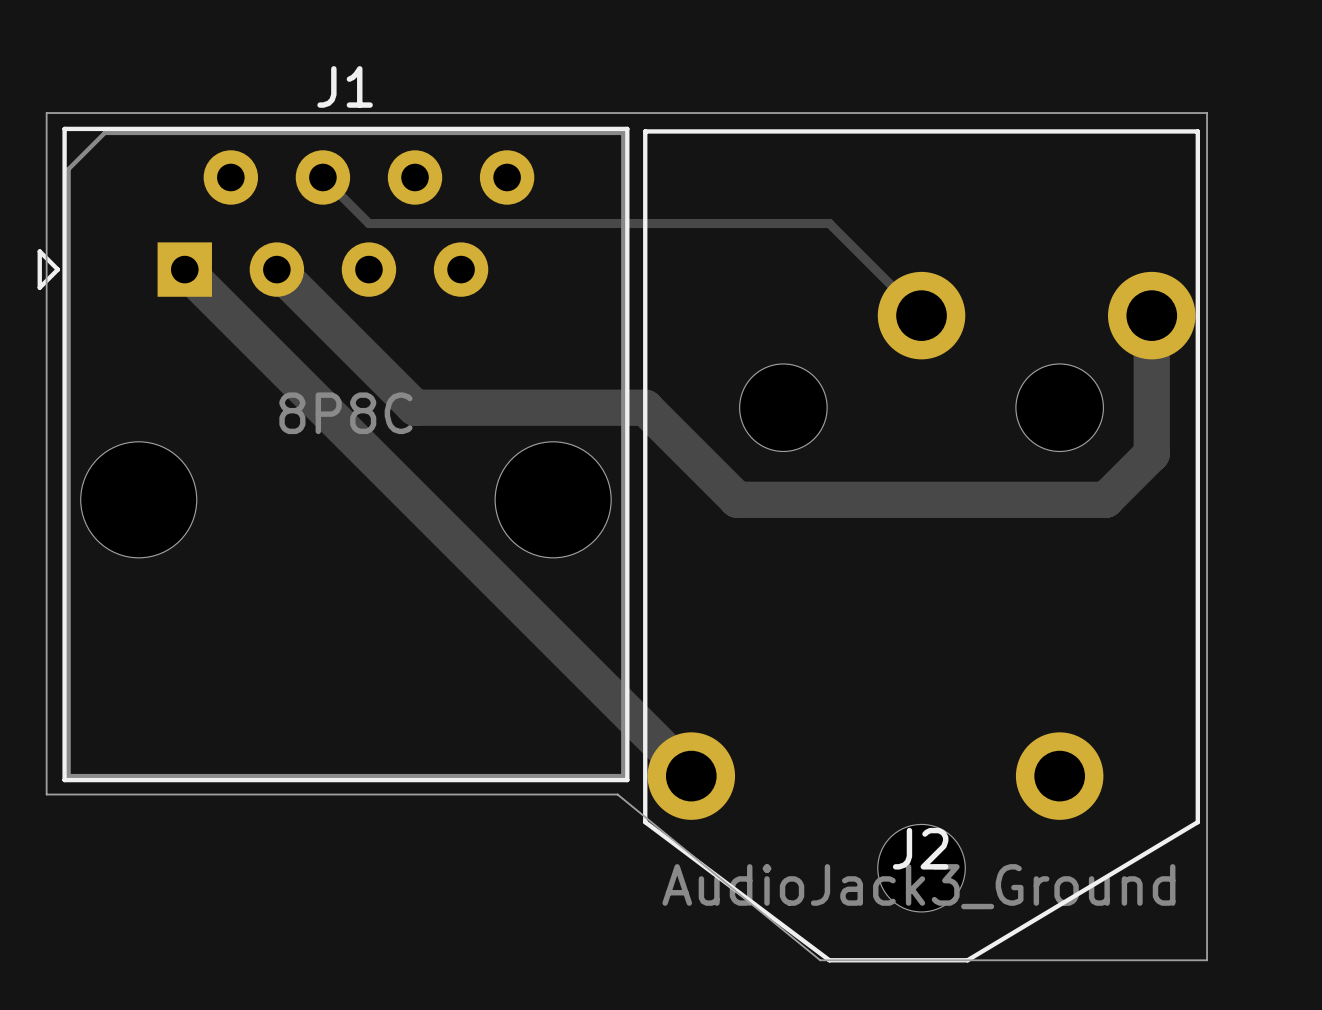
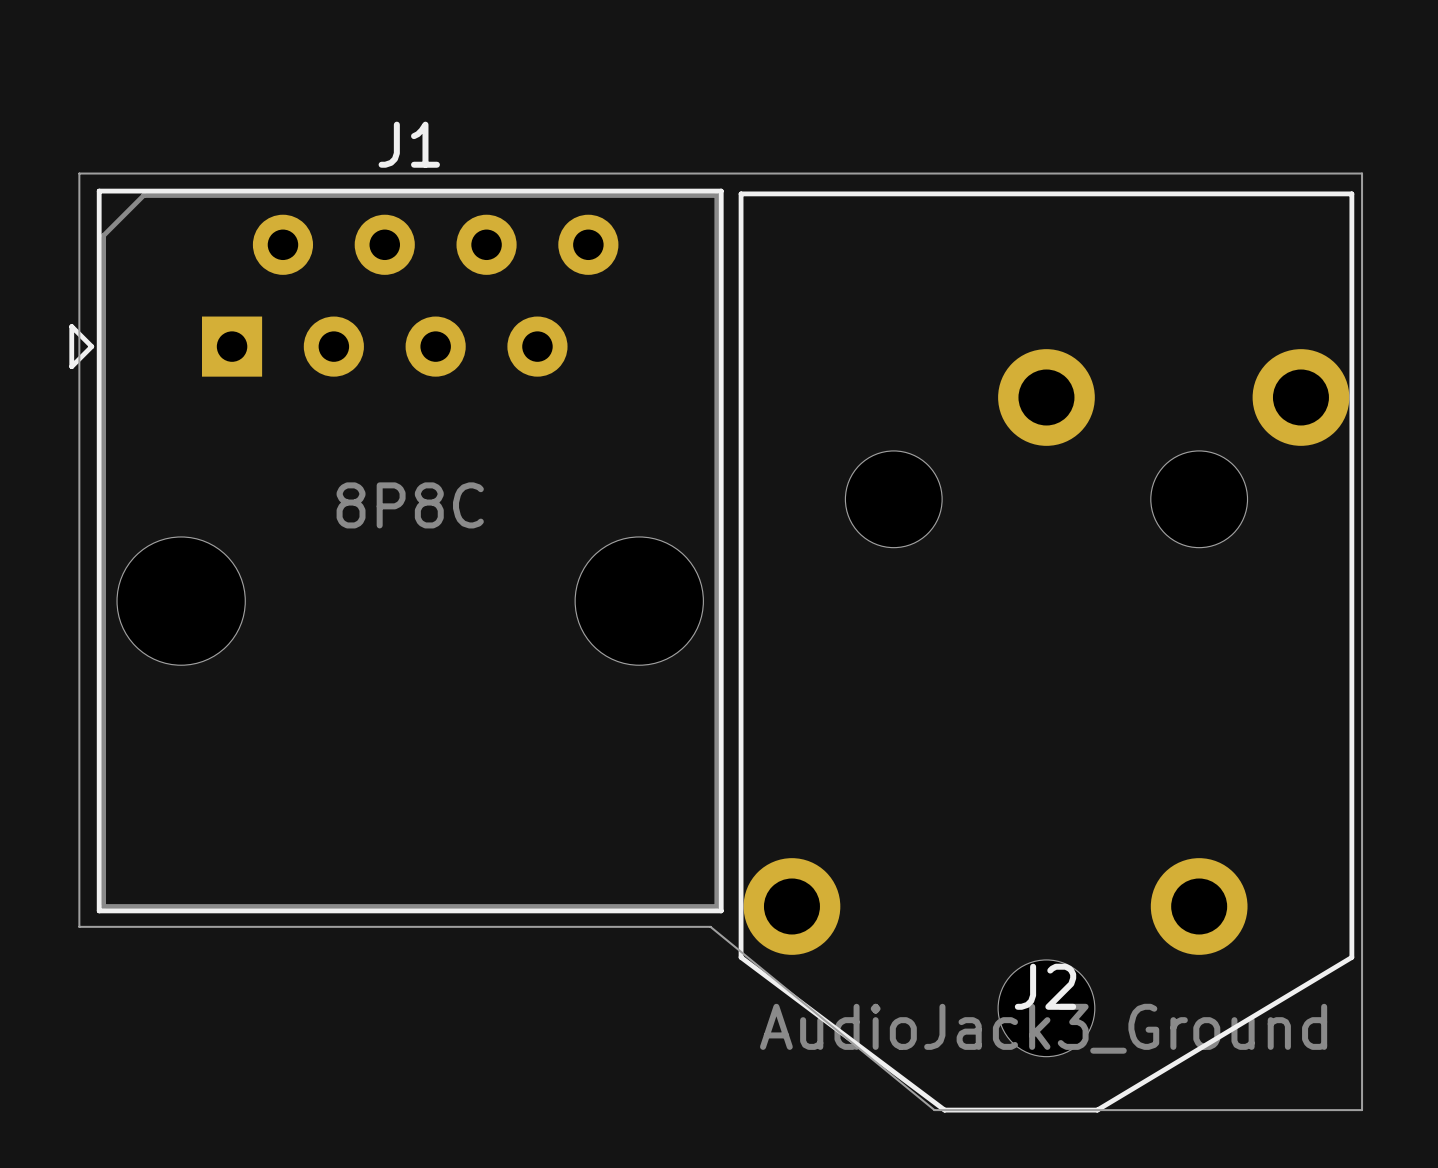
track: (322, 177) (368, 223) (829, 223) (921, 315) -> none
track: (184, 269) (691, 776) -> none
track: (276, 269) (415, 407) (645, 407) (737, 499) (1105, 499) (1151, 453) (1151, 315) -> none

